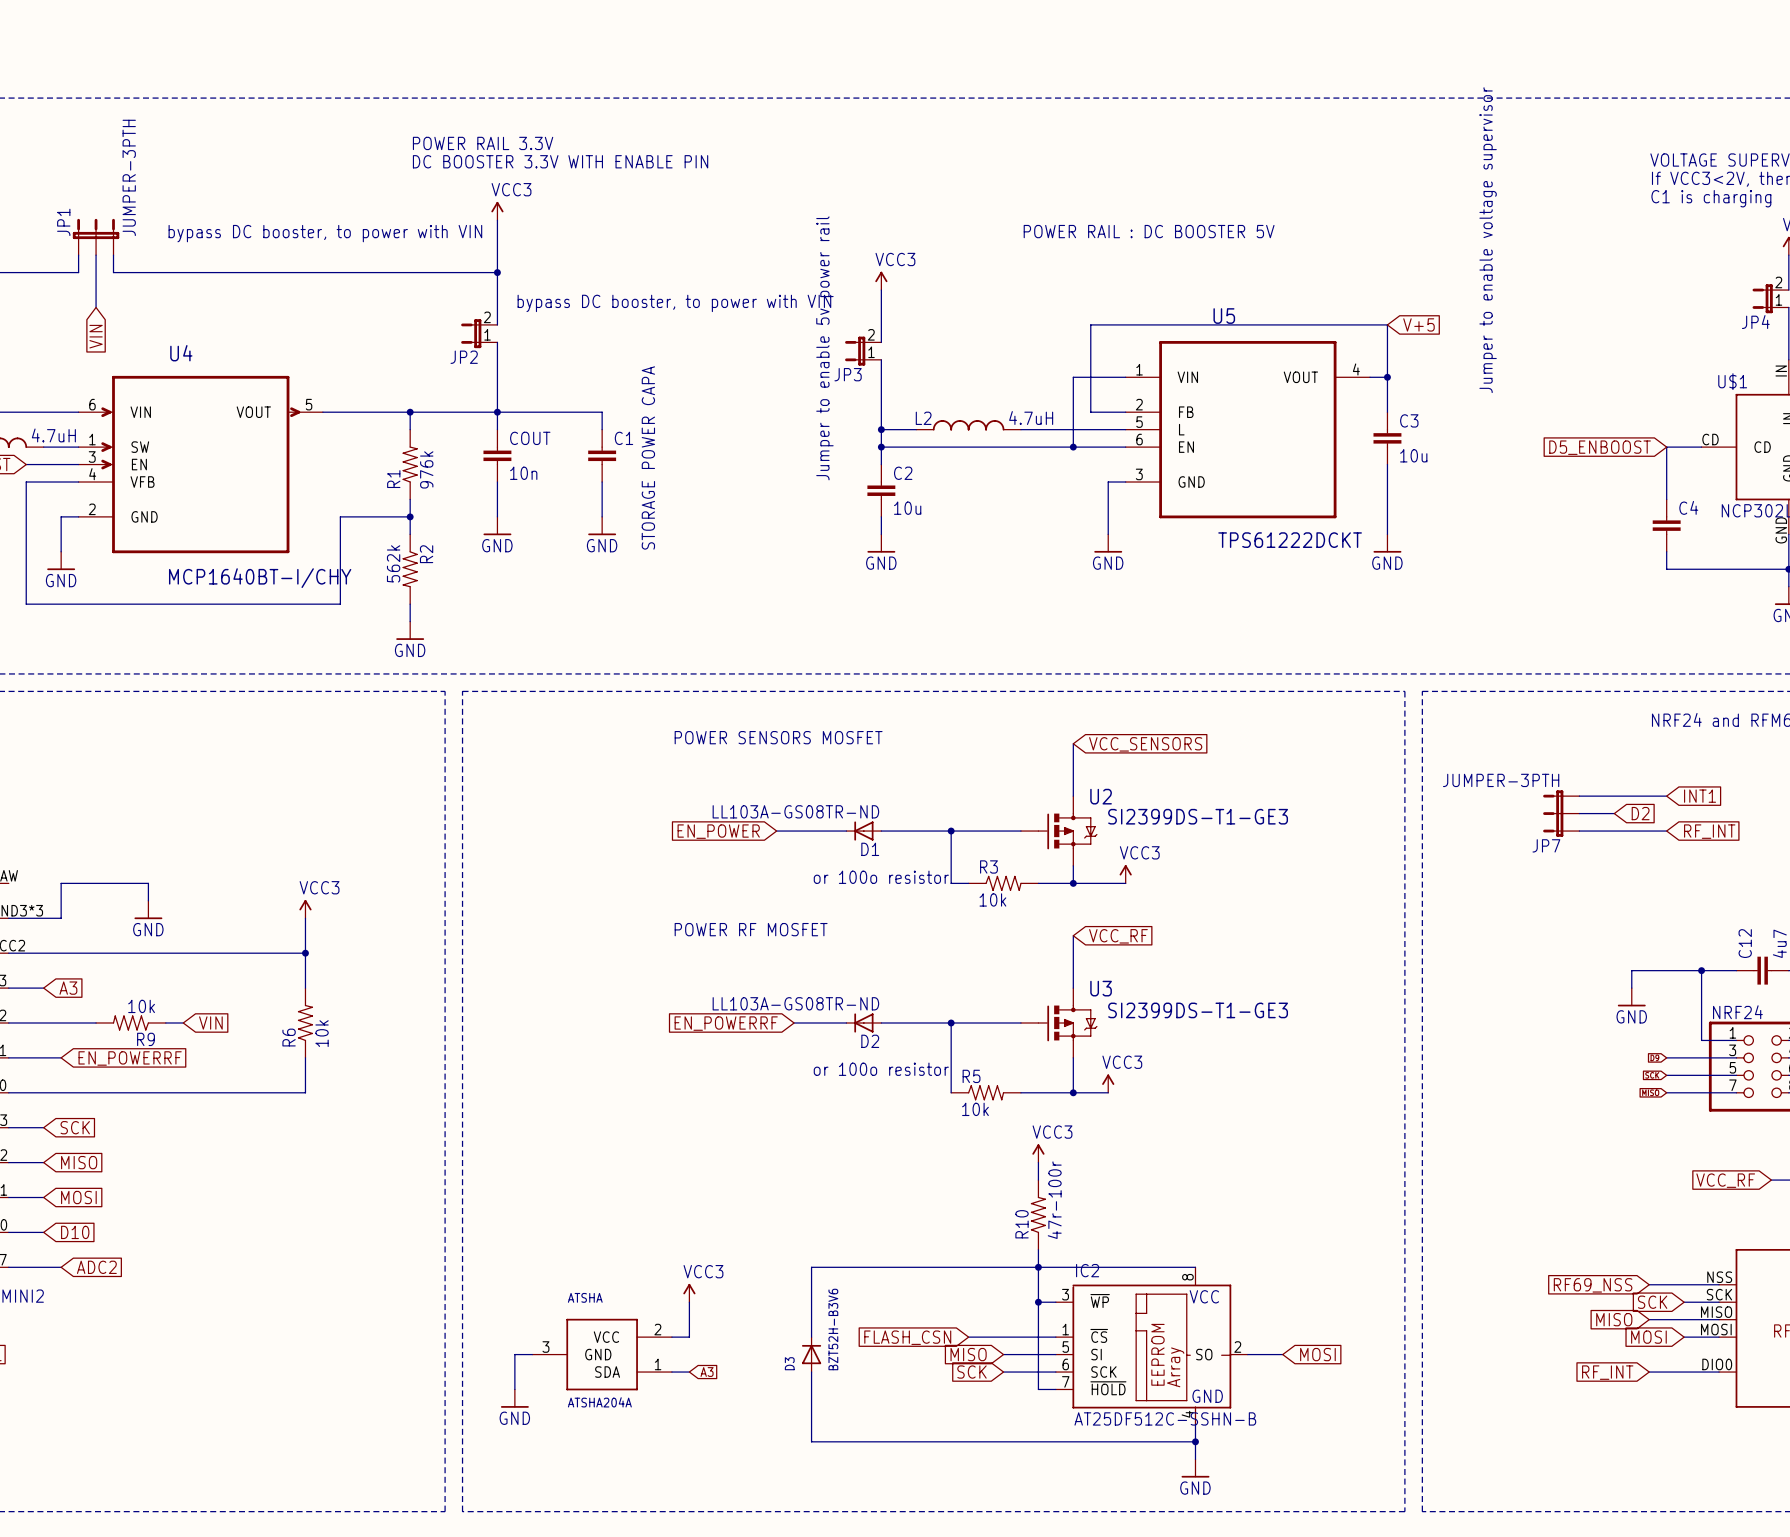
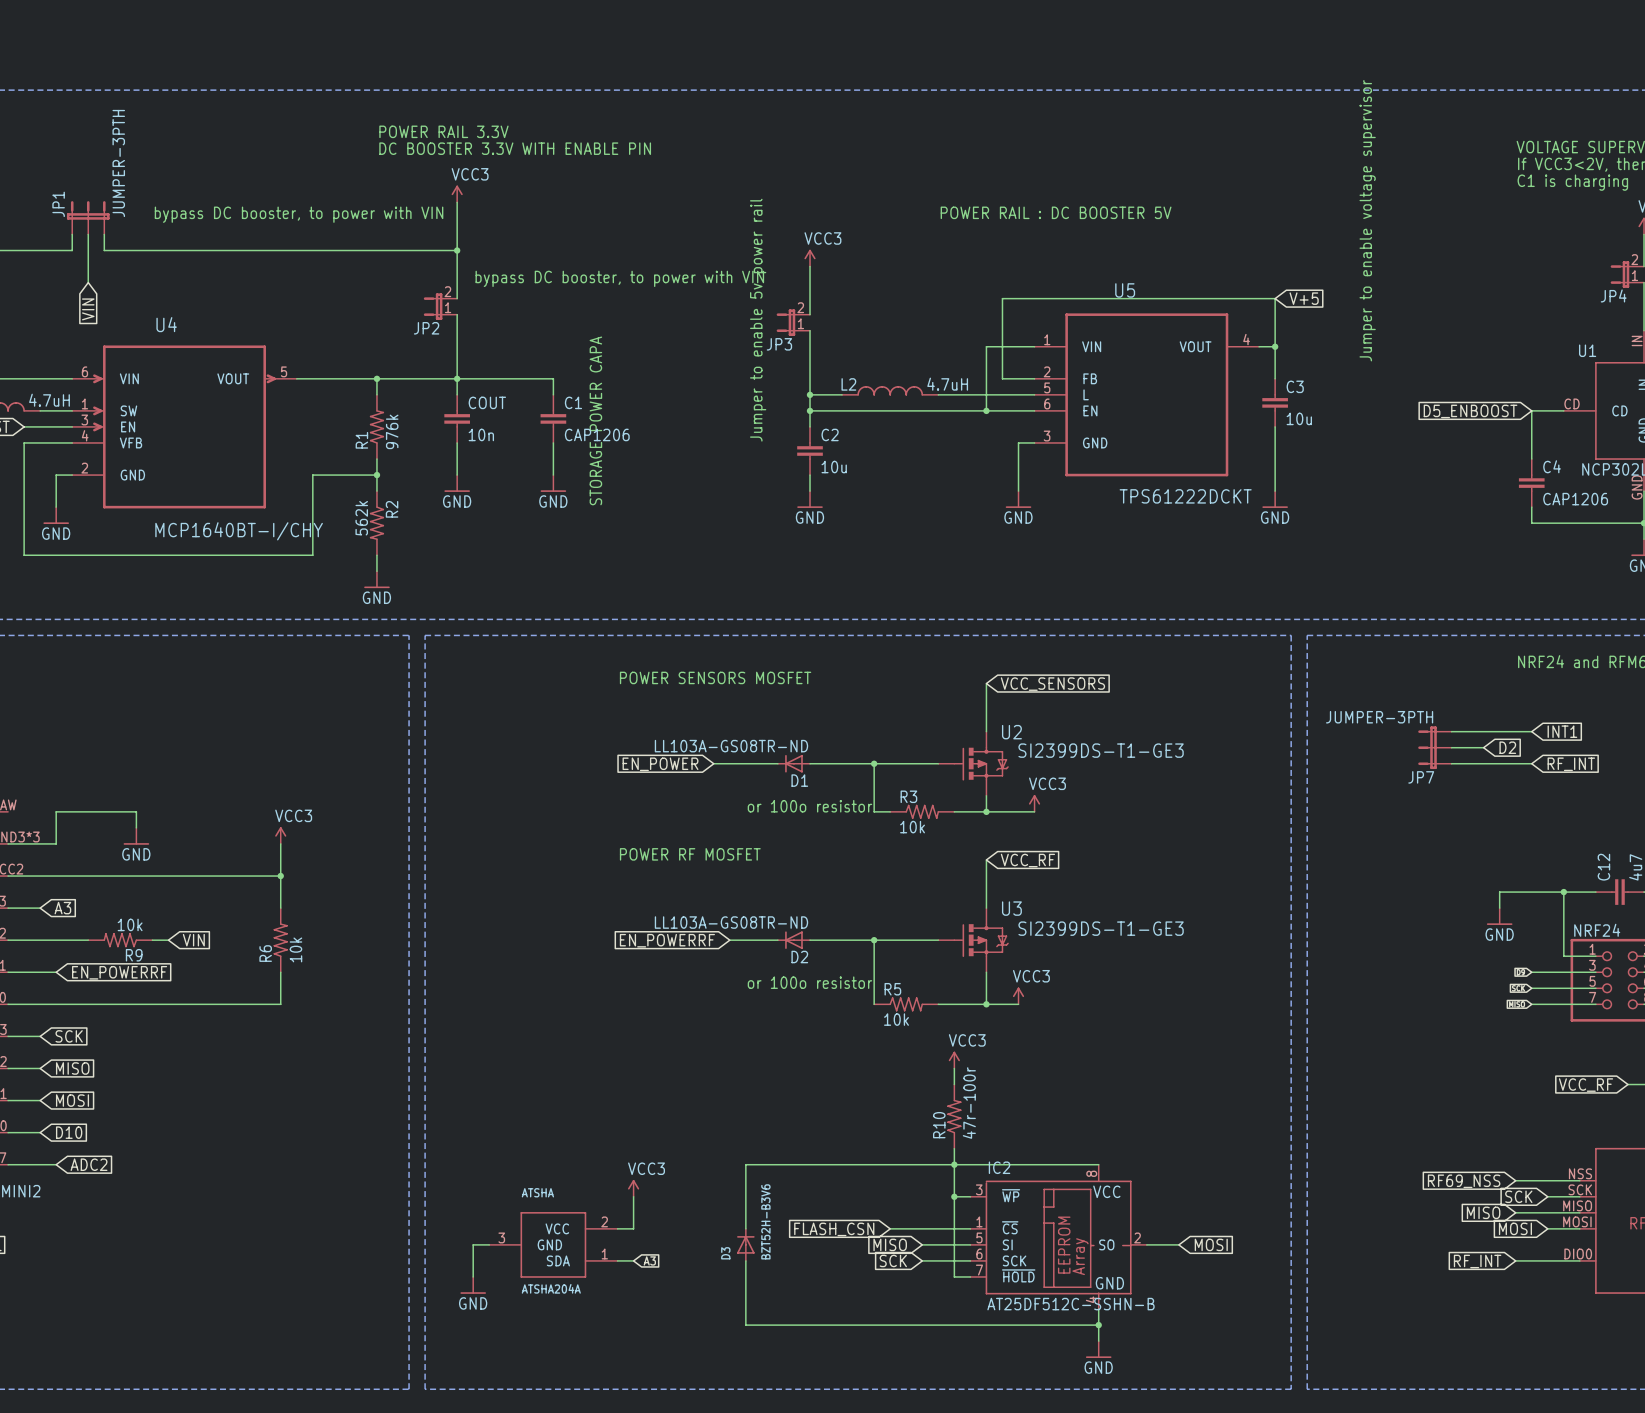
U$1 name: U$1 (1732, 381) -> U1 (1587, 350)
C1 value: none -> CAP1206 (597, 434)
C4 value: none -> CAP1206 (1575, 499)

